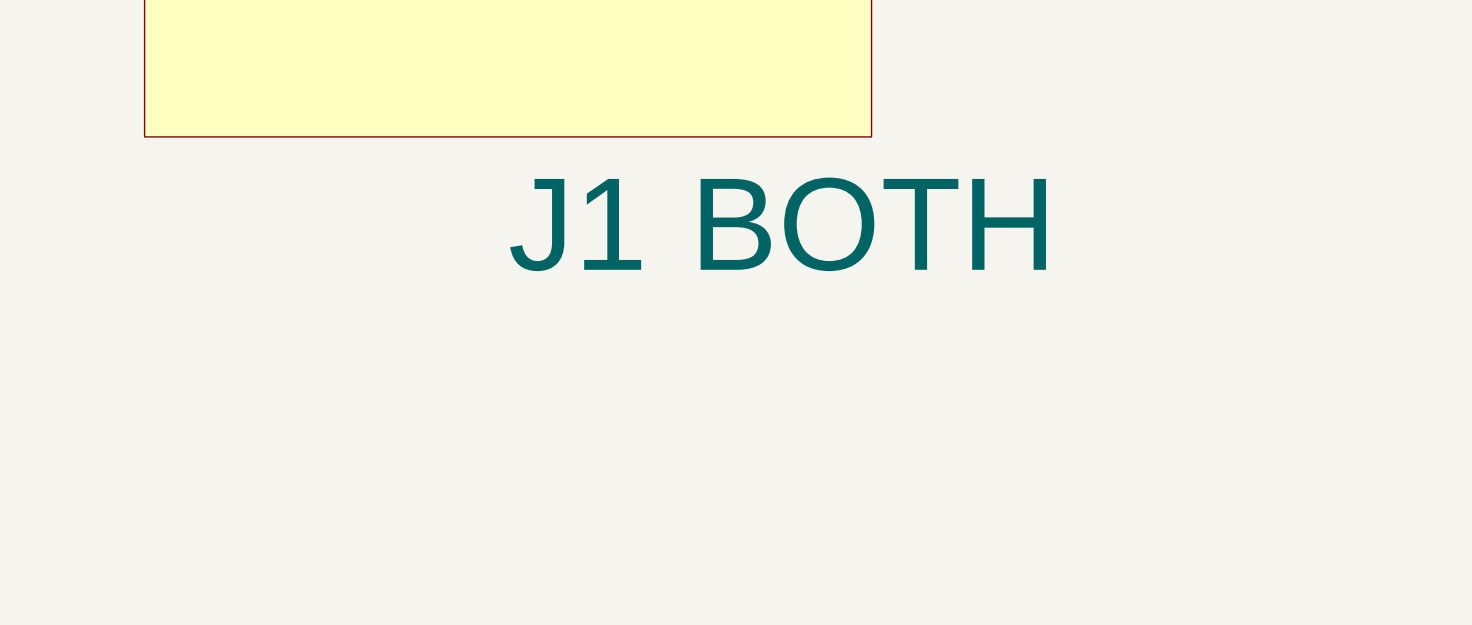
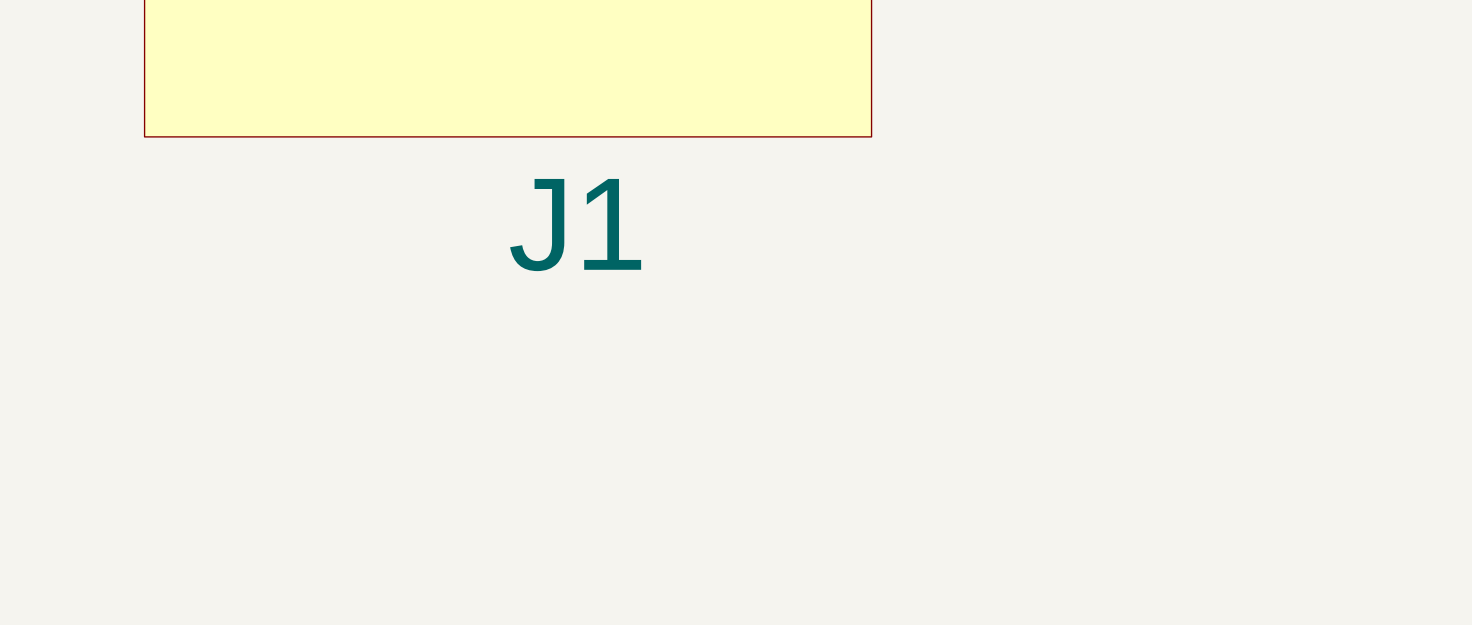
J1 text: BOTH (873, 224) -> none

